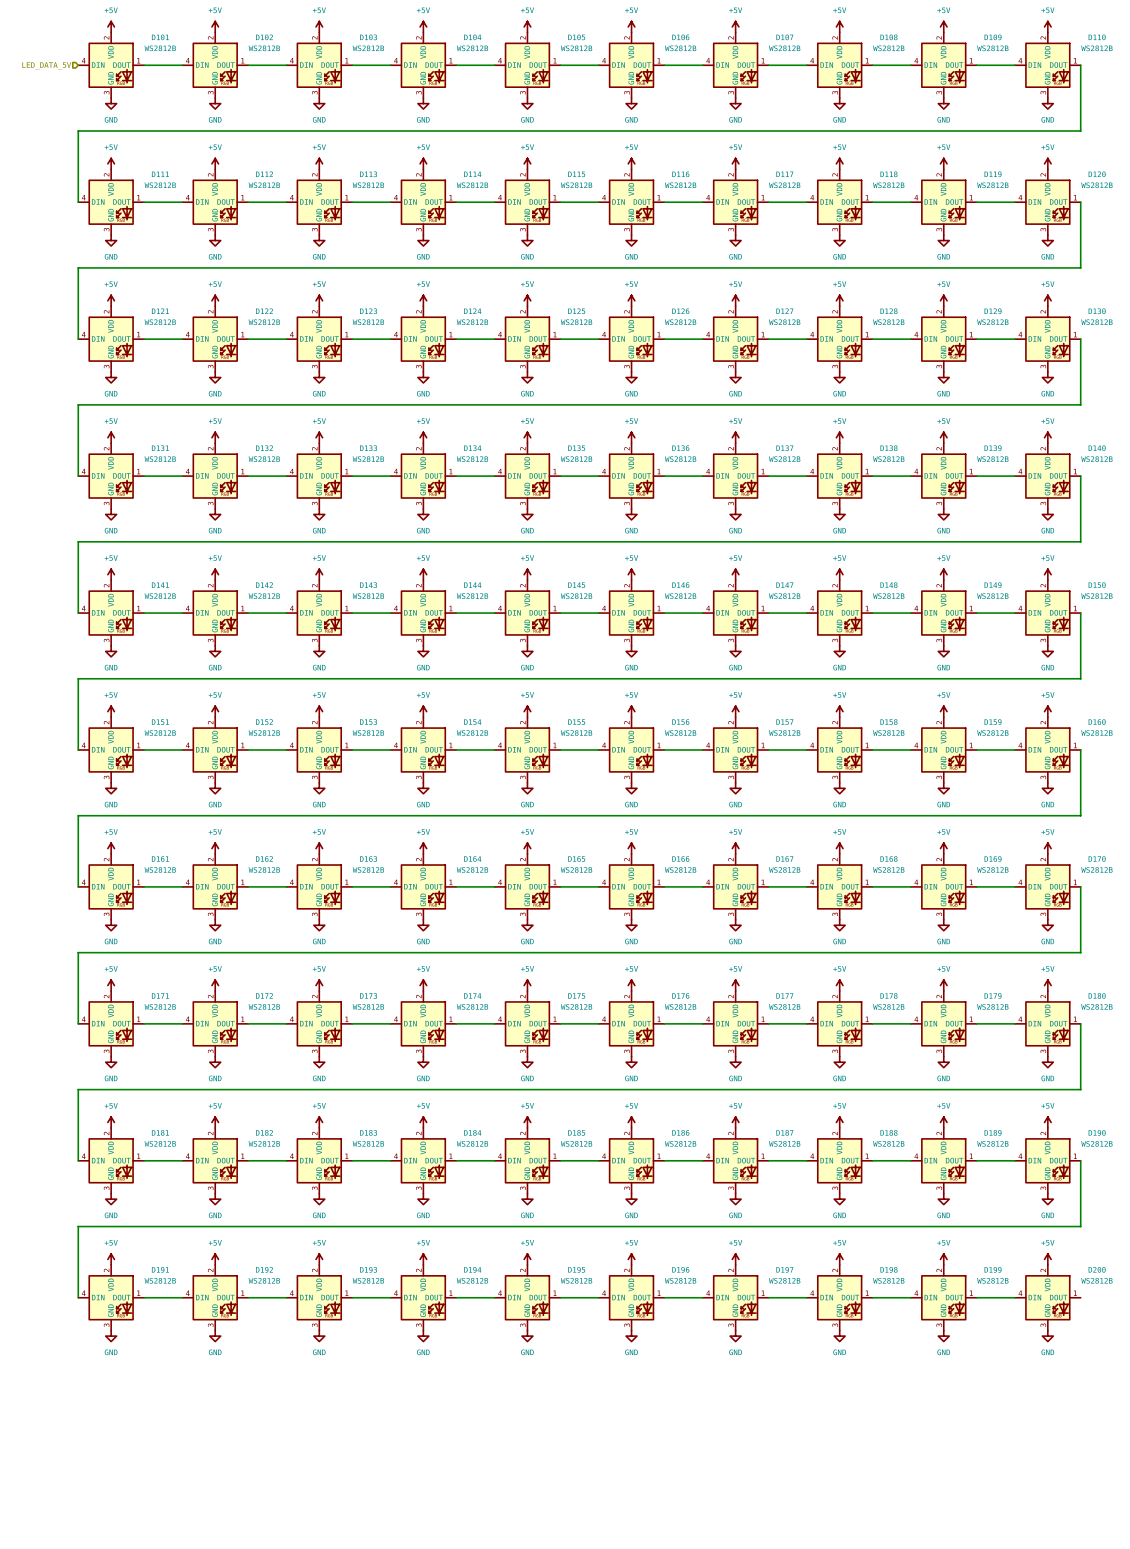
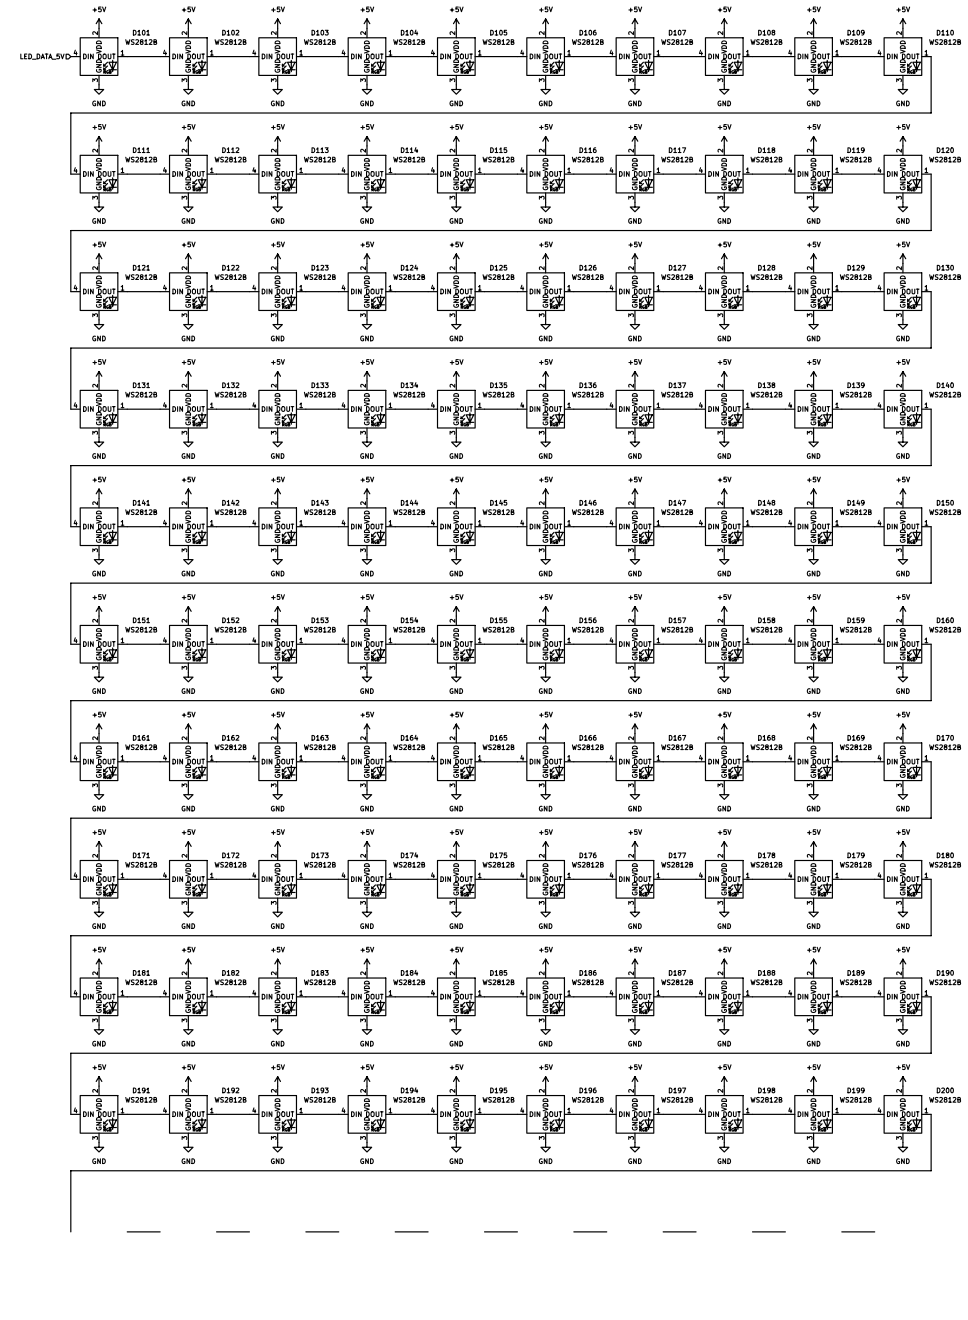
wire: none -> (931, 1114) (931, 1170) (70, 1170) (70, 1231)
wire: none -> (127, 1231) (160, 1231)
wire: none -> (216, 1231) (249, 1231)
wire: none -> (305, 1231) (338, 1231)
wire: none -> (395, 1231) (428, 1231)
wire: none -> (484, 1231) (517, 1231)
wire: none -> (573, 1231) (606, 1231)
wire: none -> (663, 1231) (696, 1231)
wire: none -> (752, 1231) (785, 1231)
wire: none -> (841, 1231) (874, 1231)

